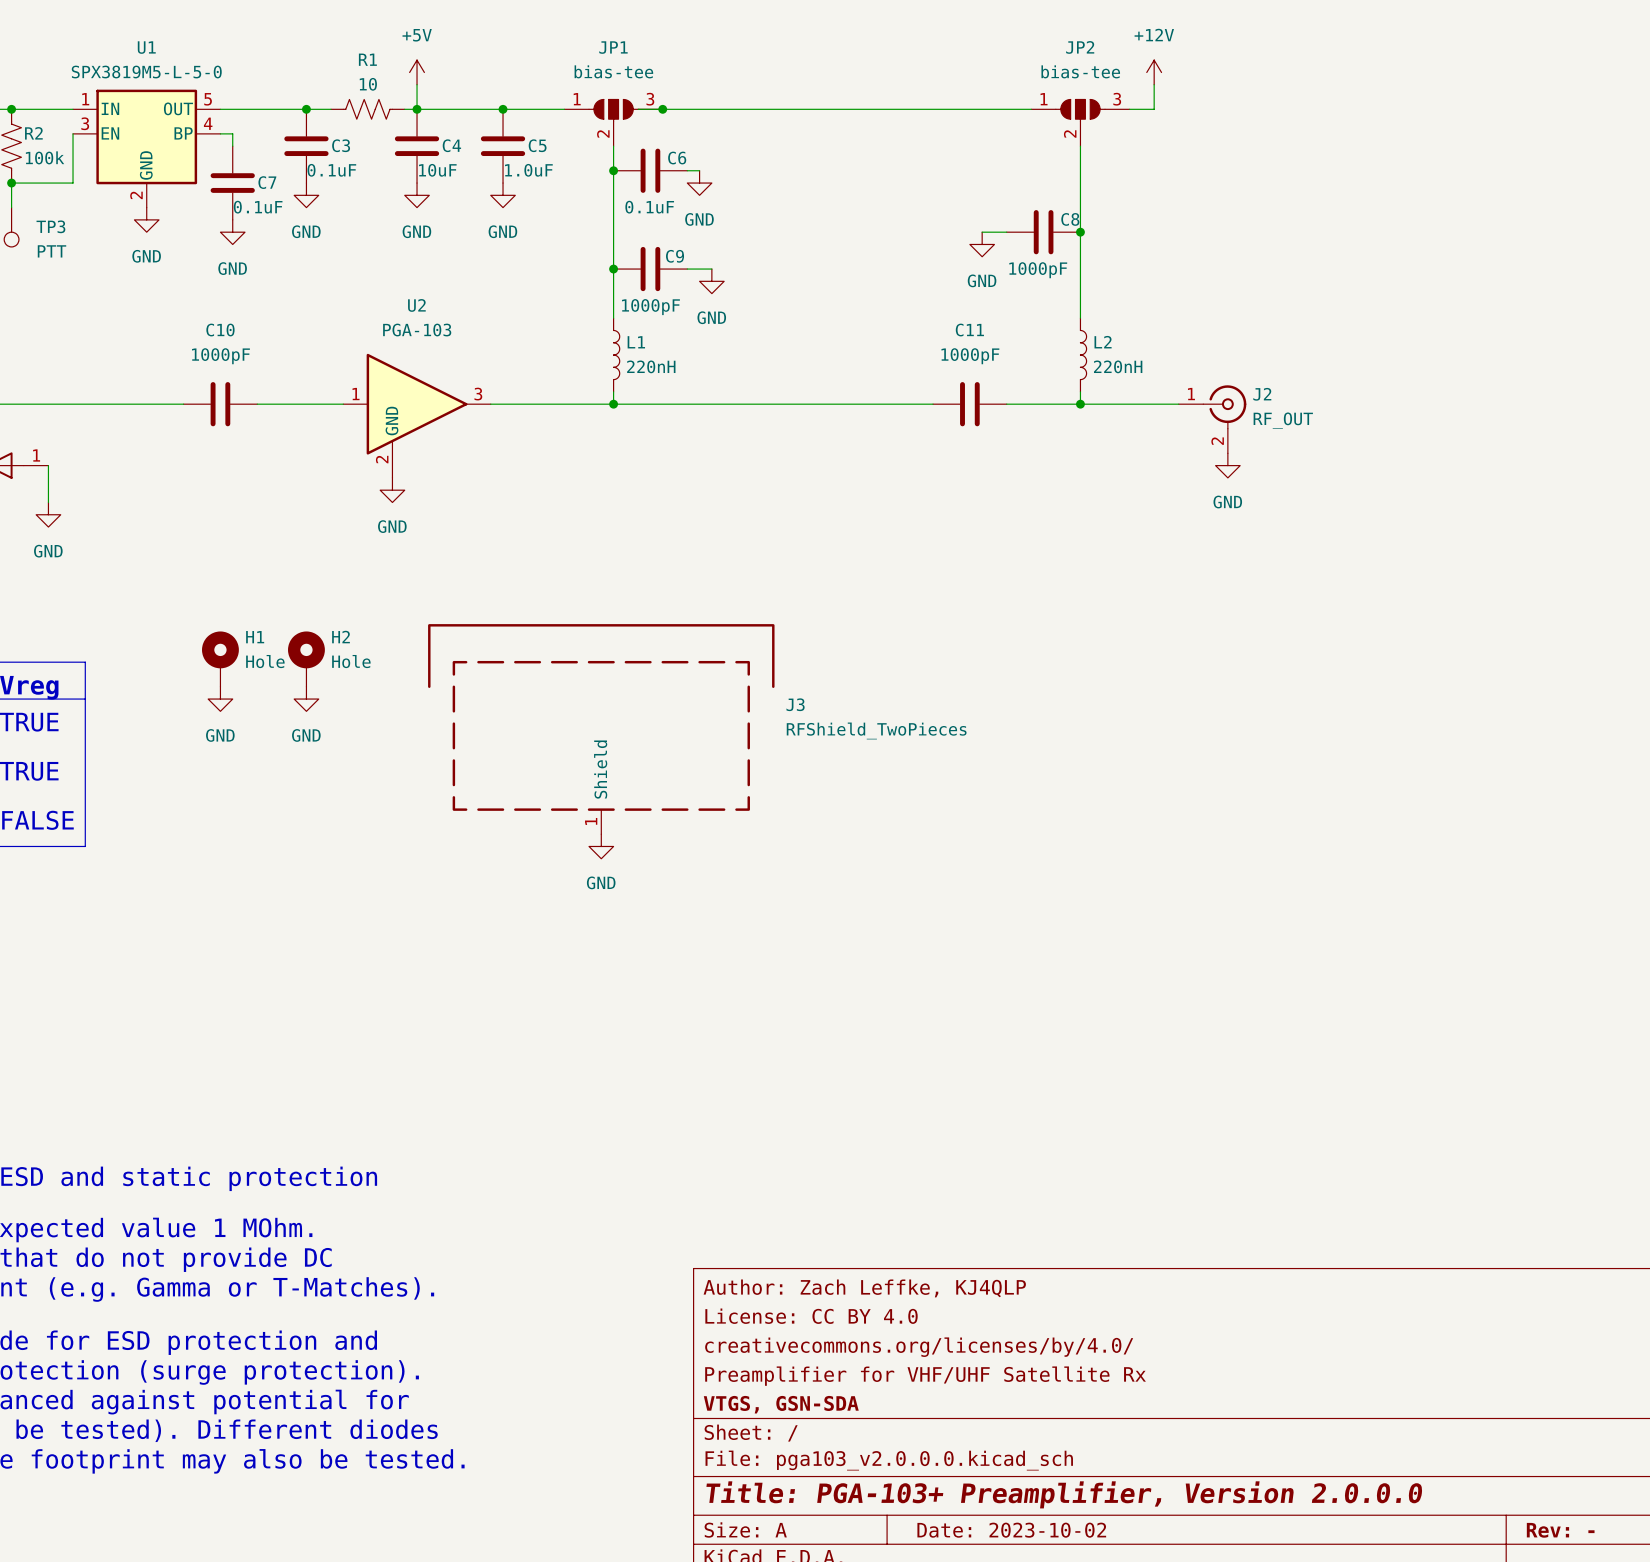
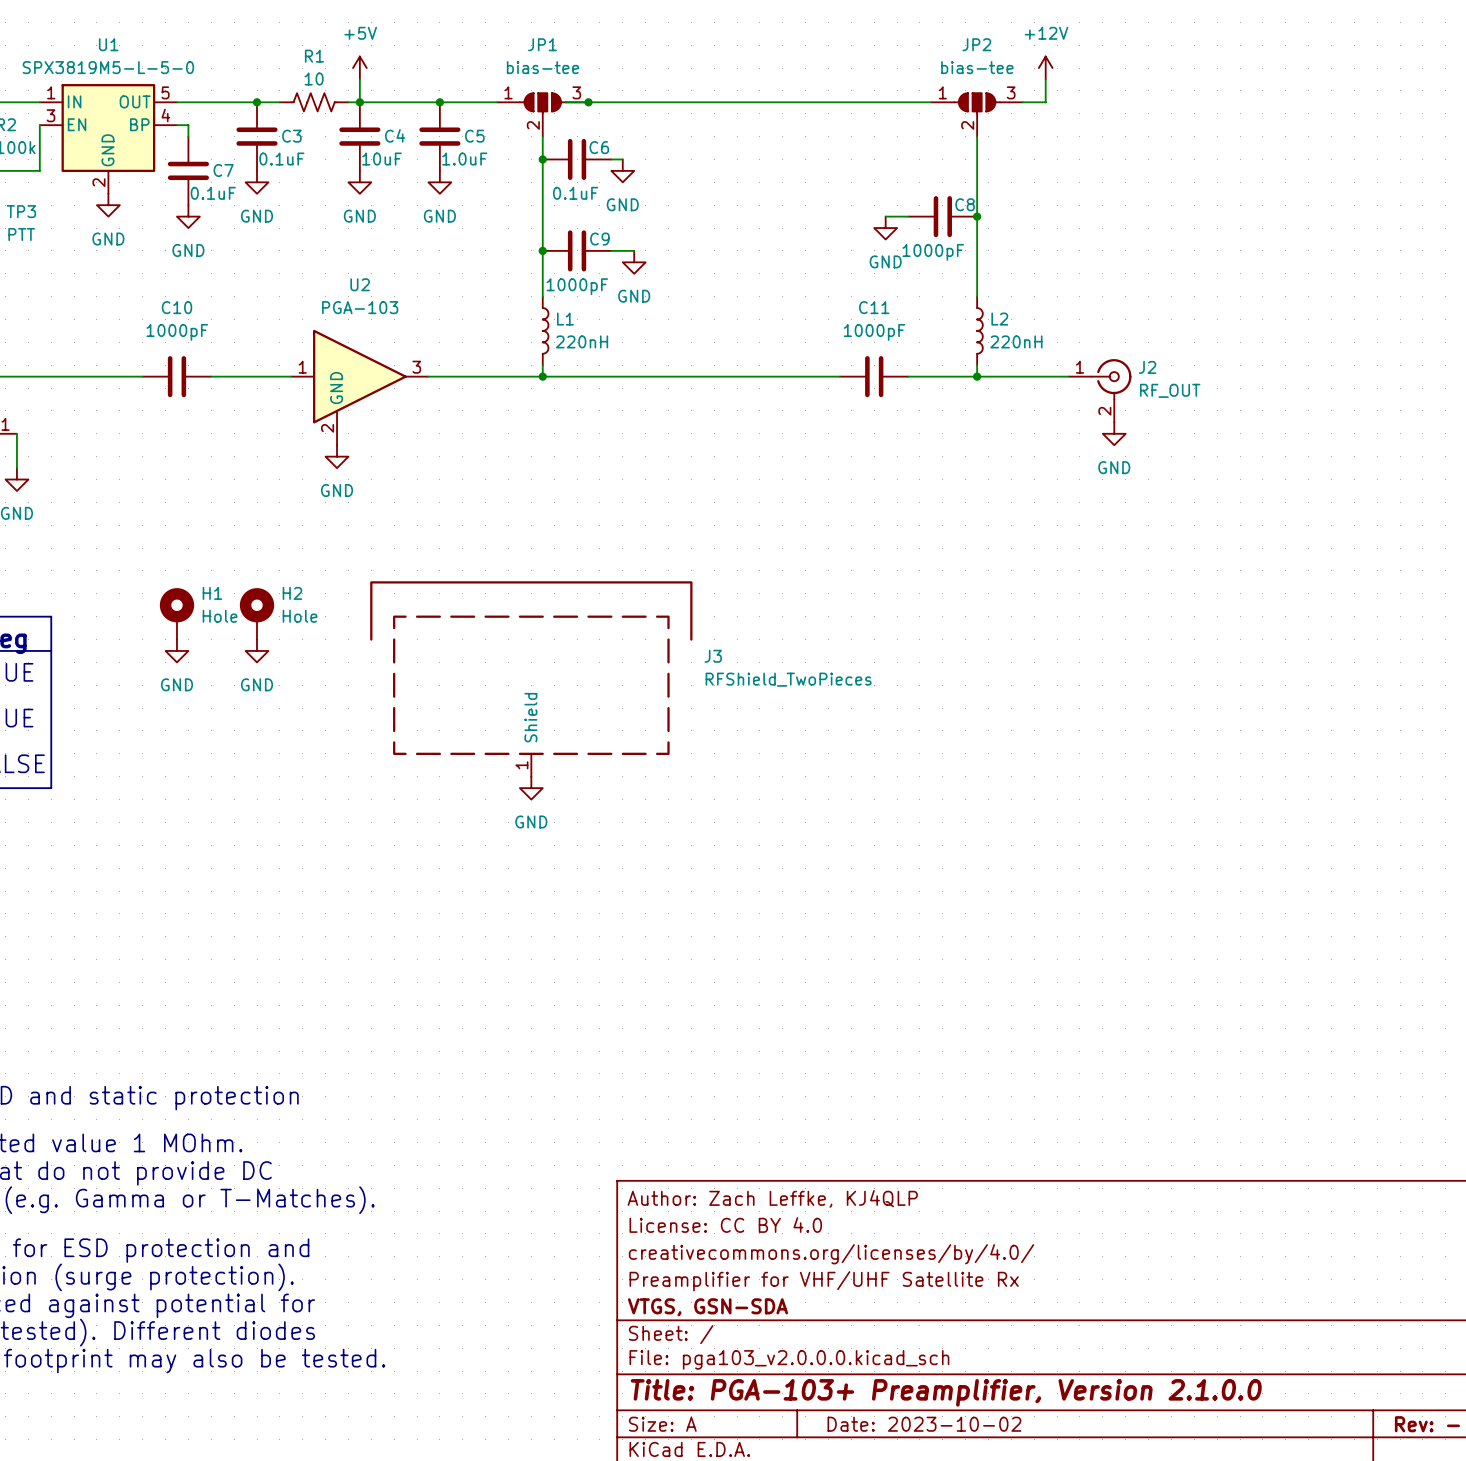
title block: Title: PGA-103+ Preamplifier, Version 2.0.0.0 (1064, 1494) -> Title: PGA-103+ Preamplifier, Version 2.1.0.0 (946, 1392)

